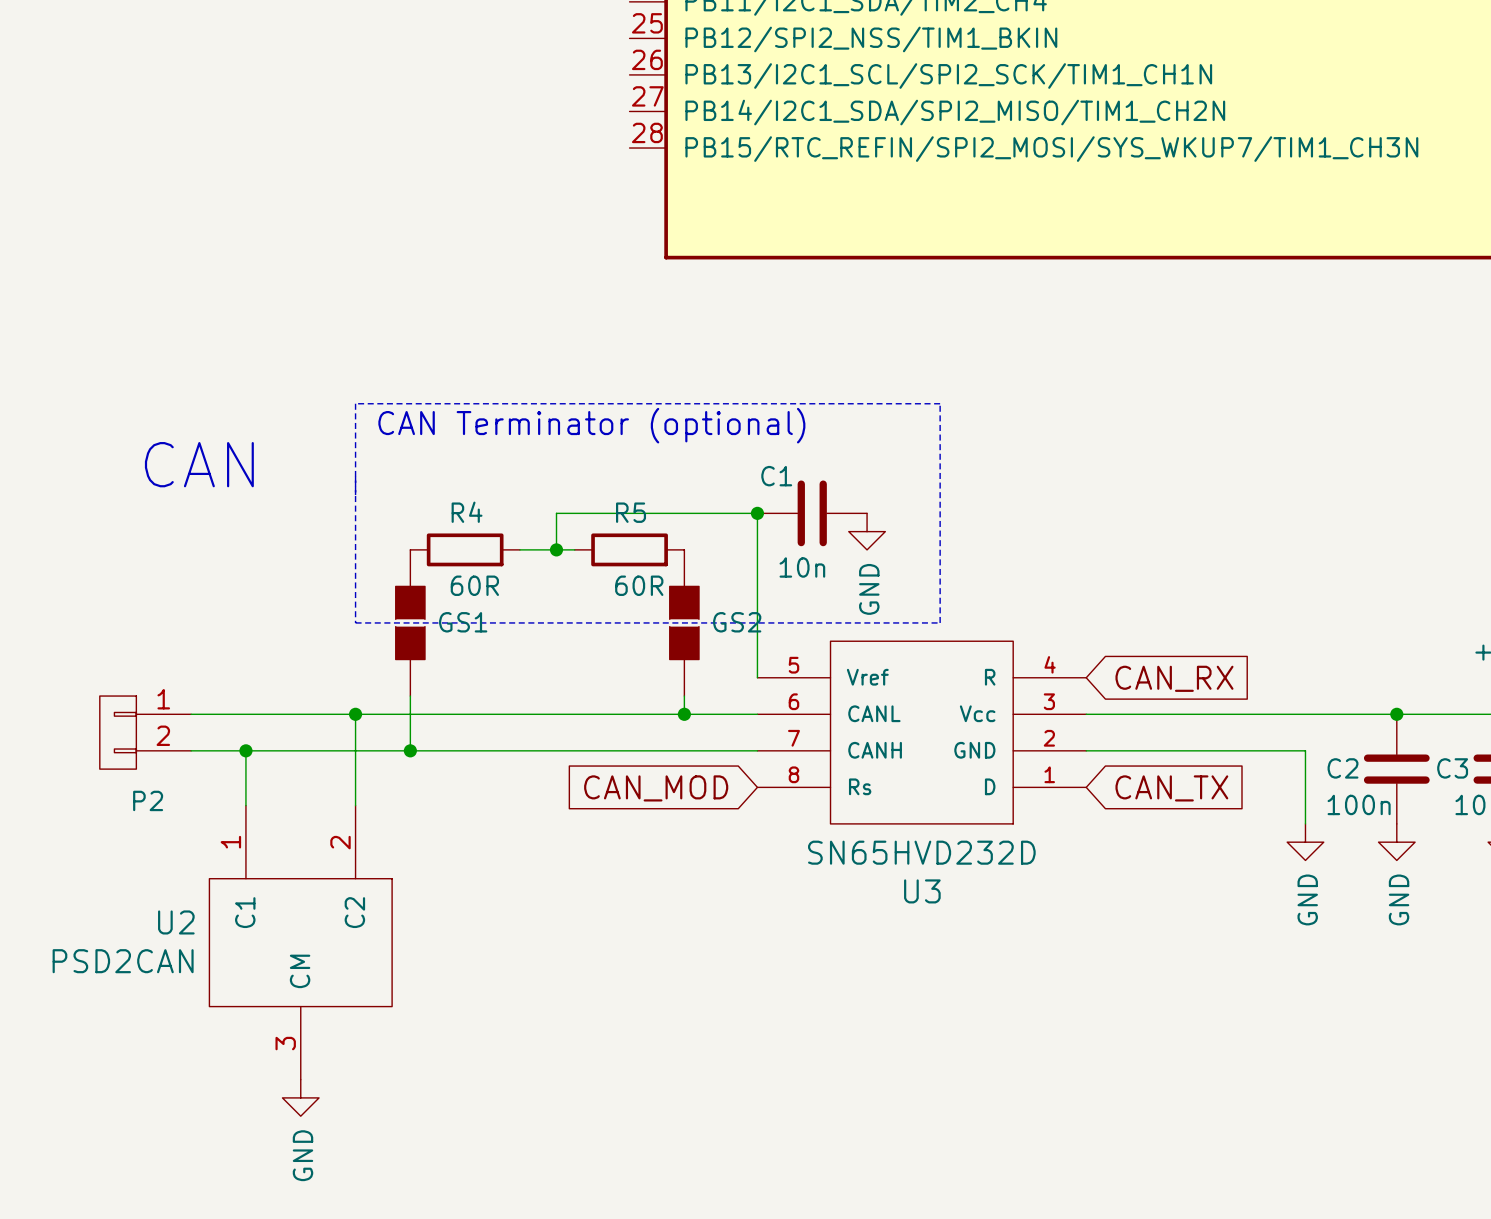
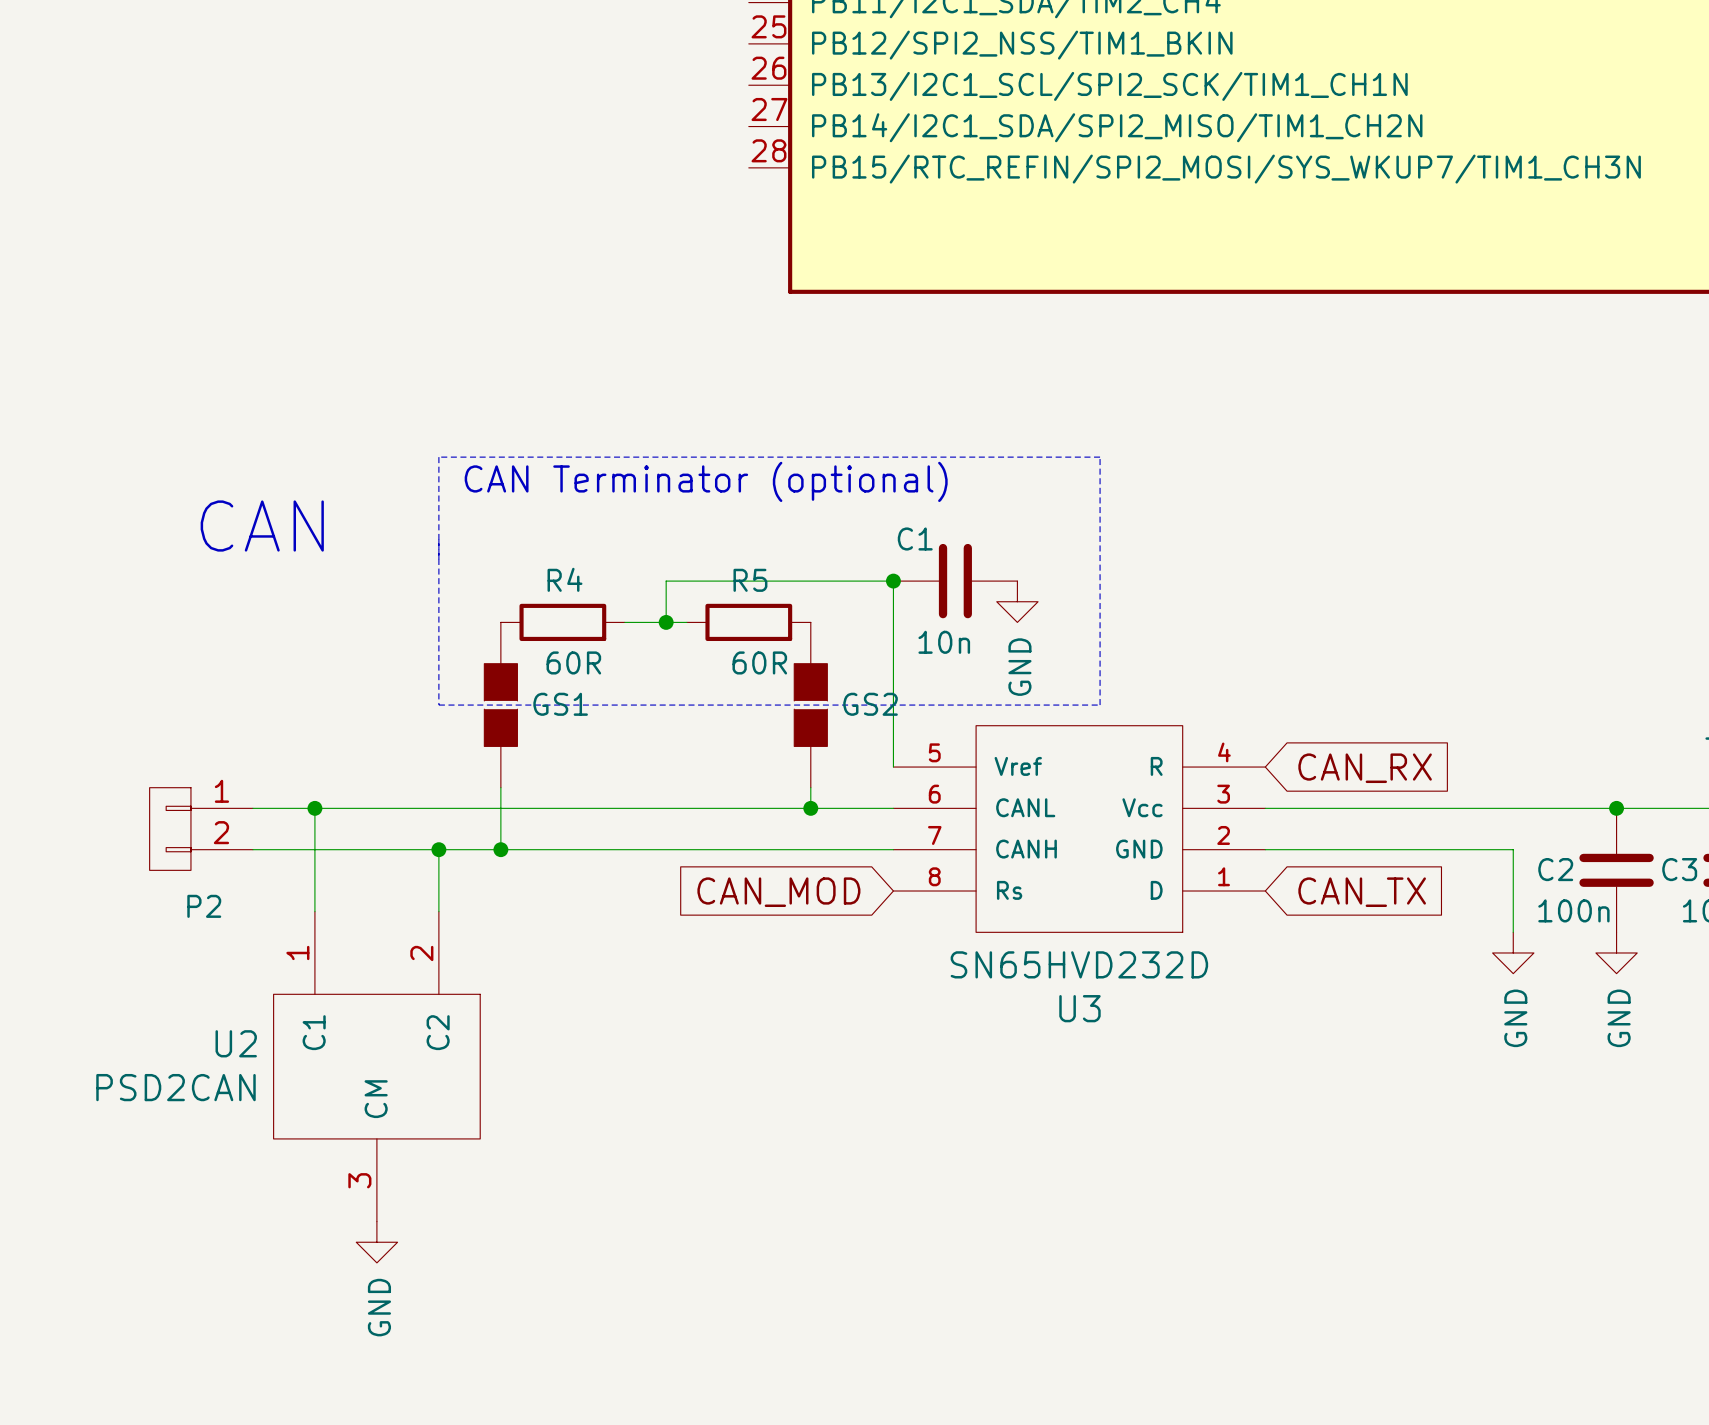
wire: (355, 714) (355, 750) -> (314, 808) (314, 849)
junction position: (355, 714) -> (438, 849)
junction position: (245, 750) -> (314, 808)

